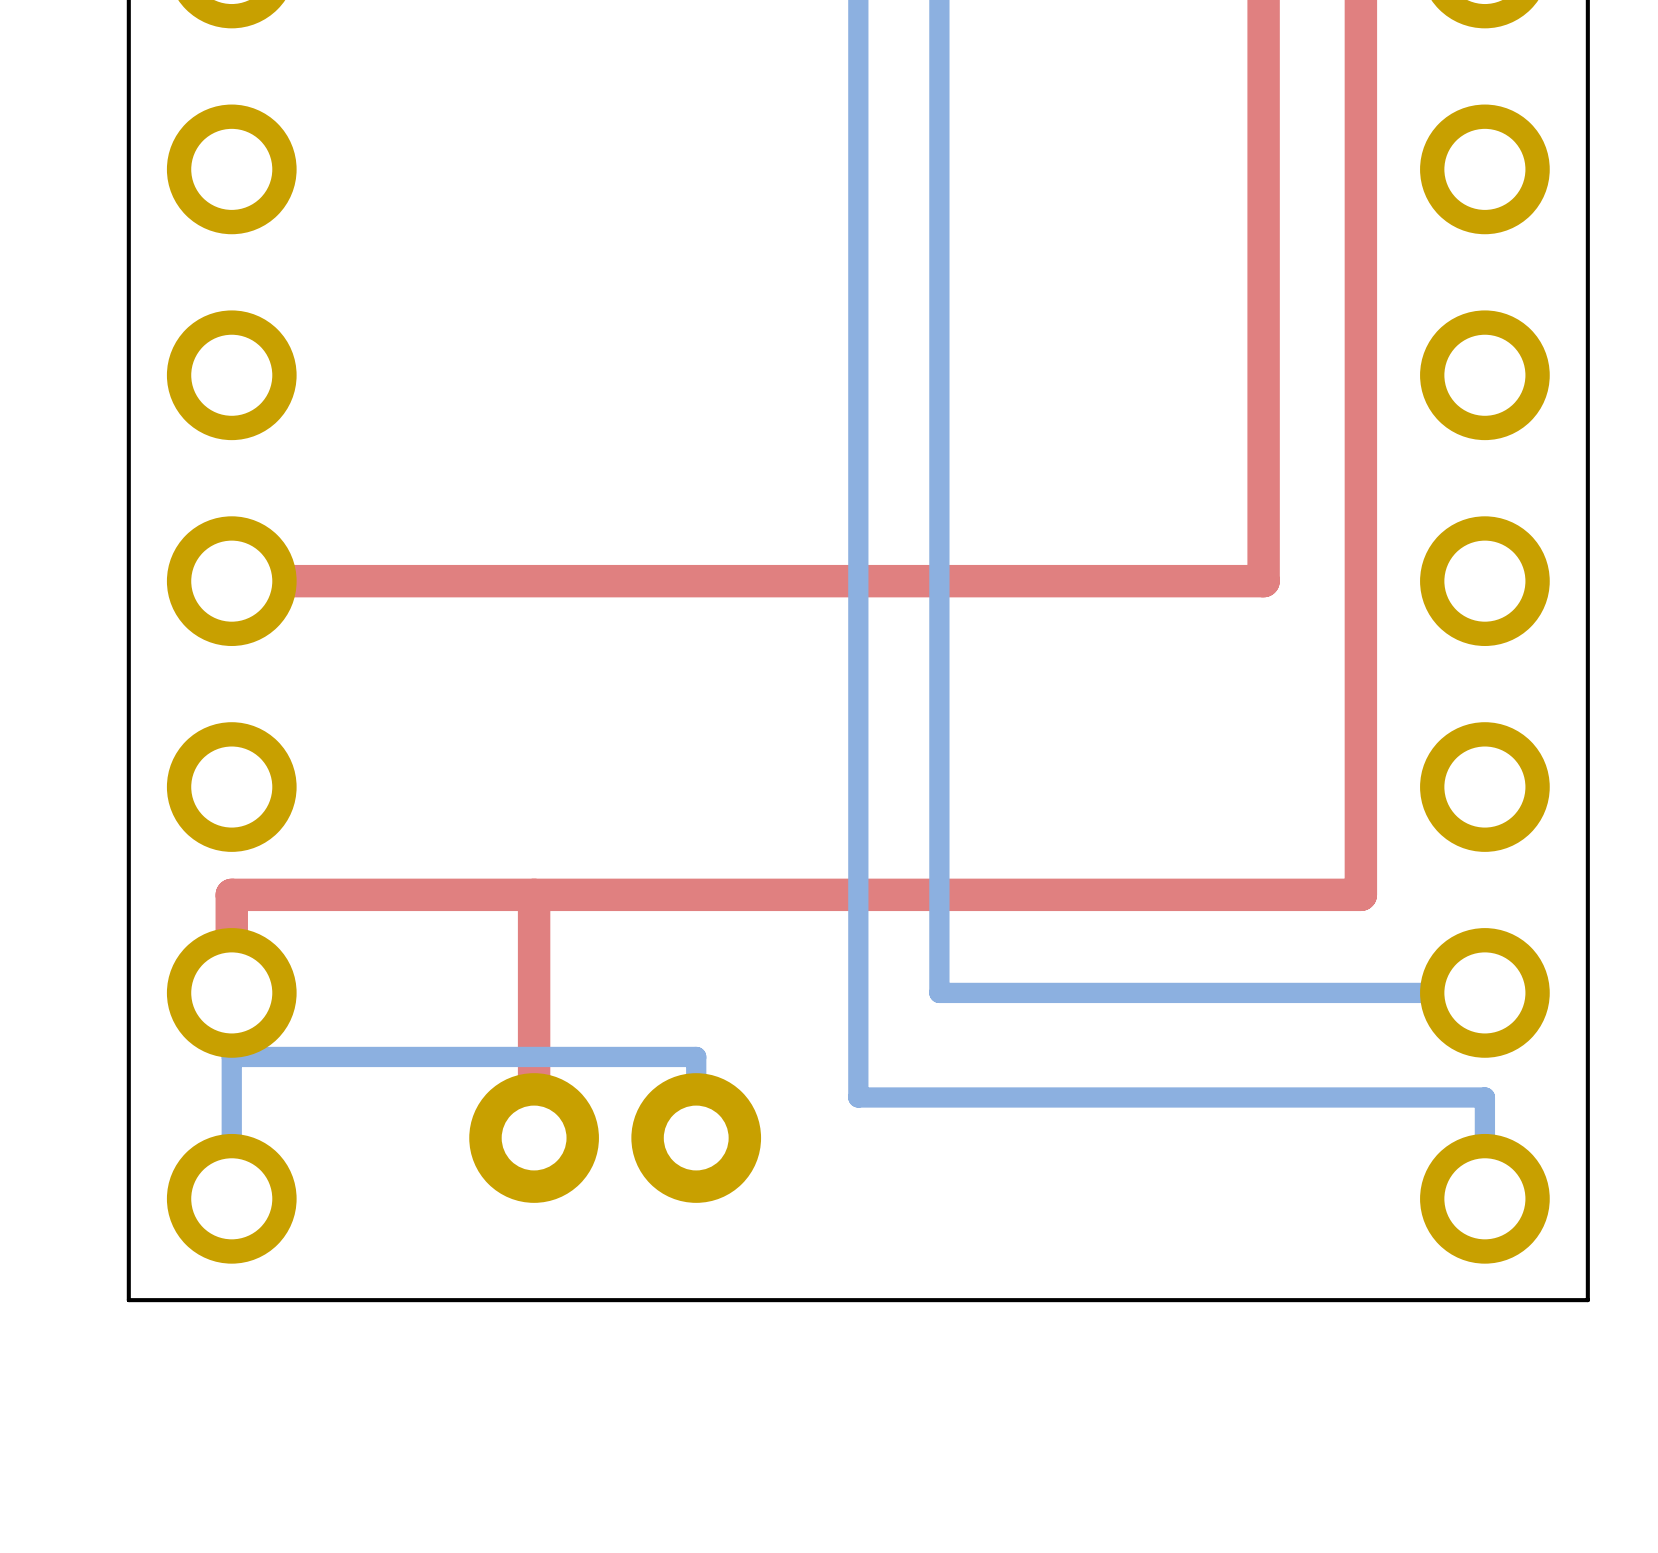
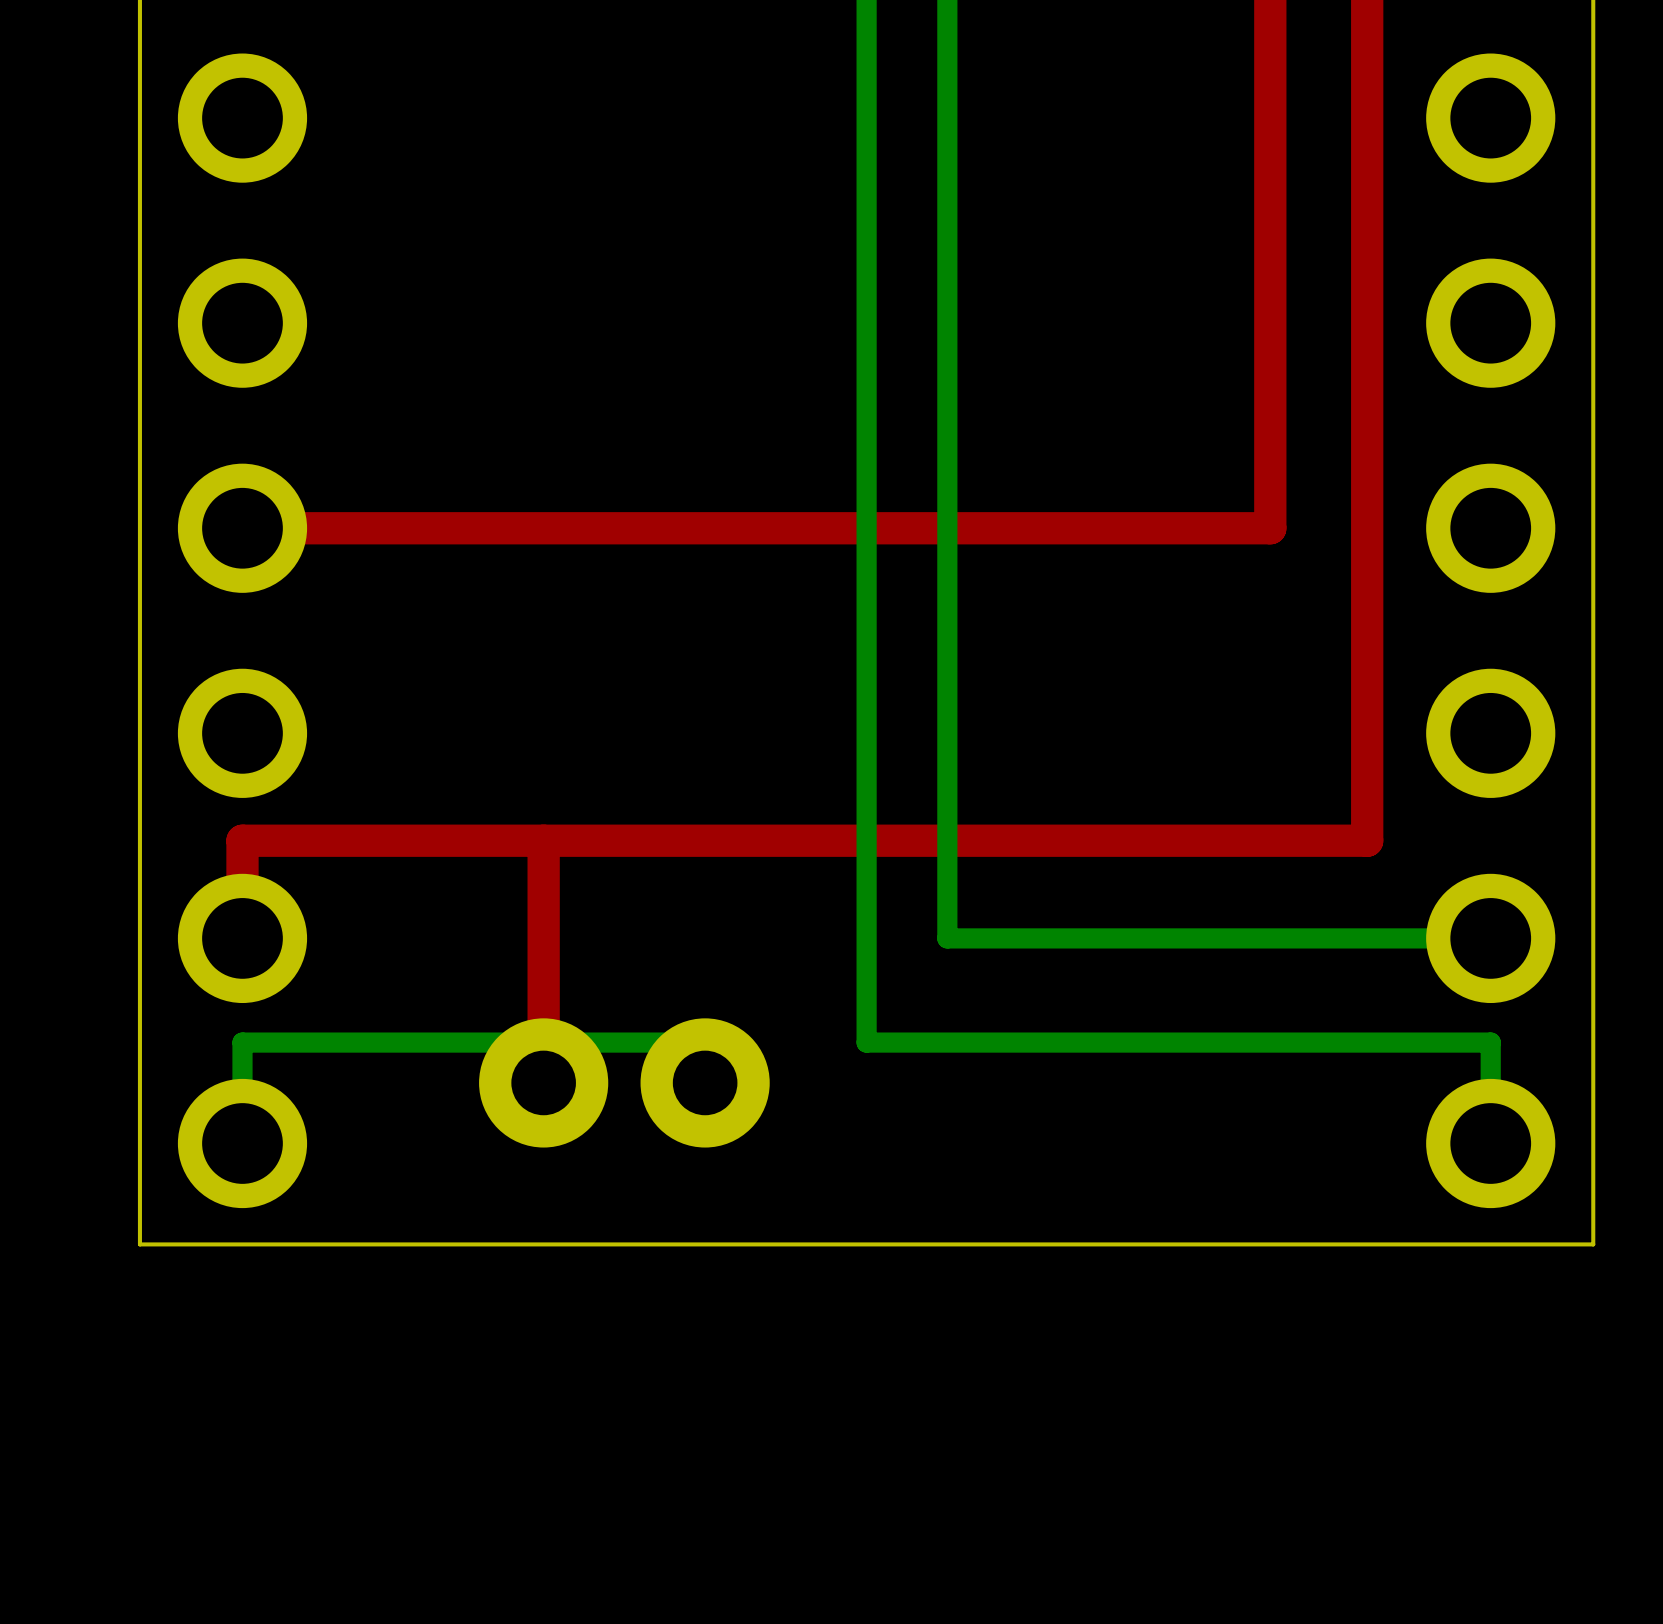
bottom track: (696, 1097) (696, 1056) (231, 1056) (231, 1097) -> (705, 1042) (242, 1042)

